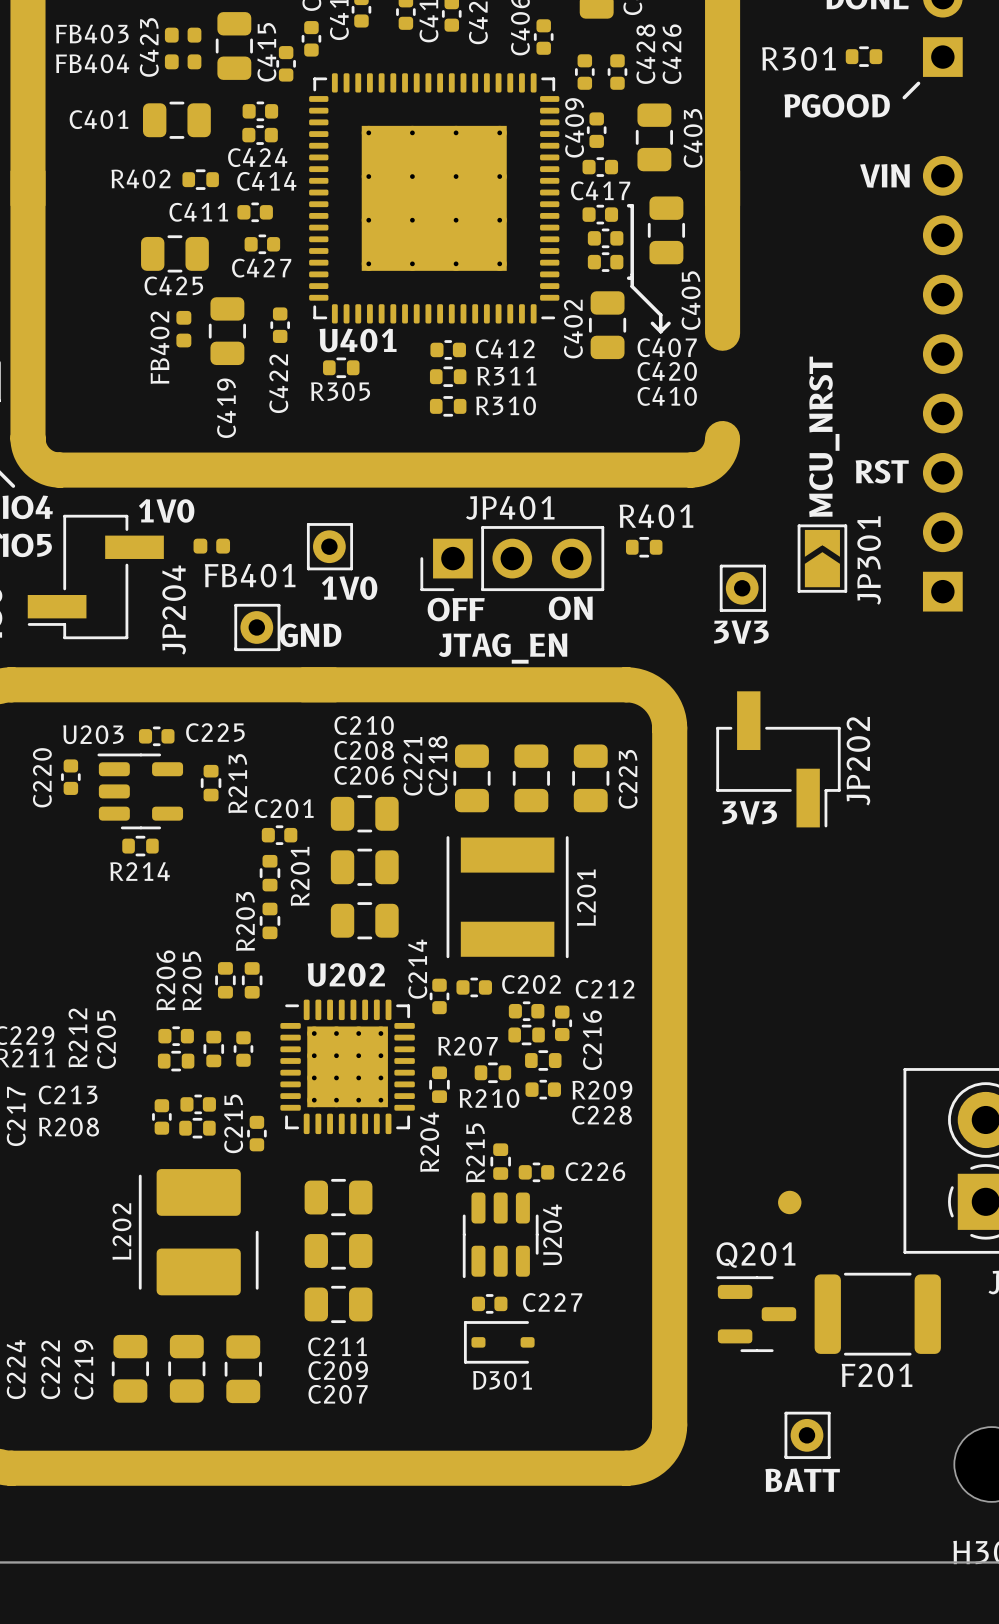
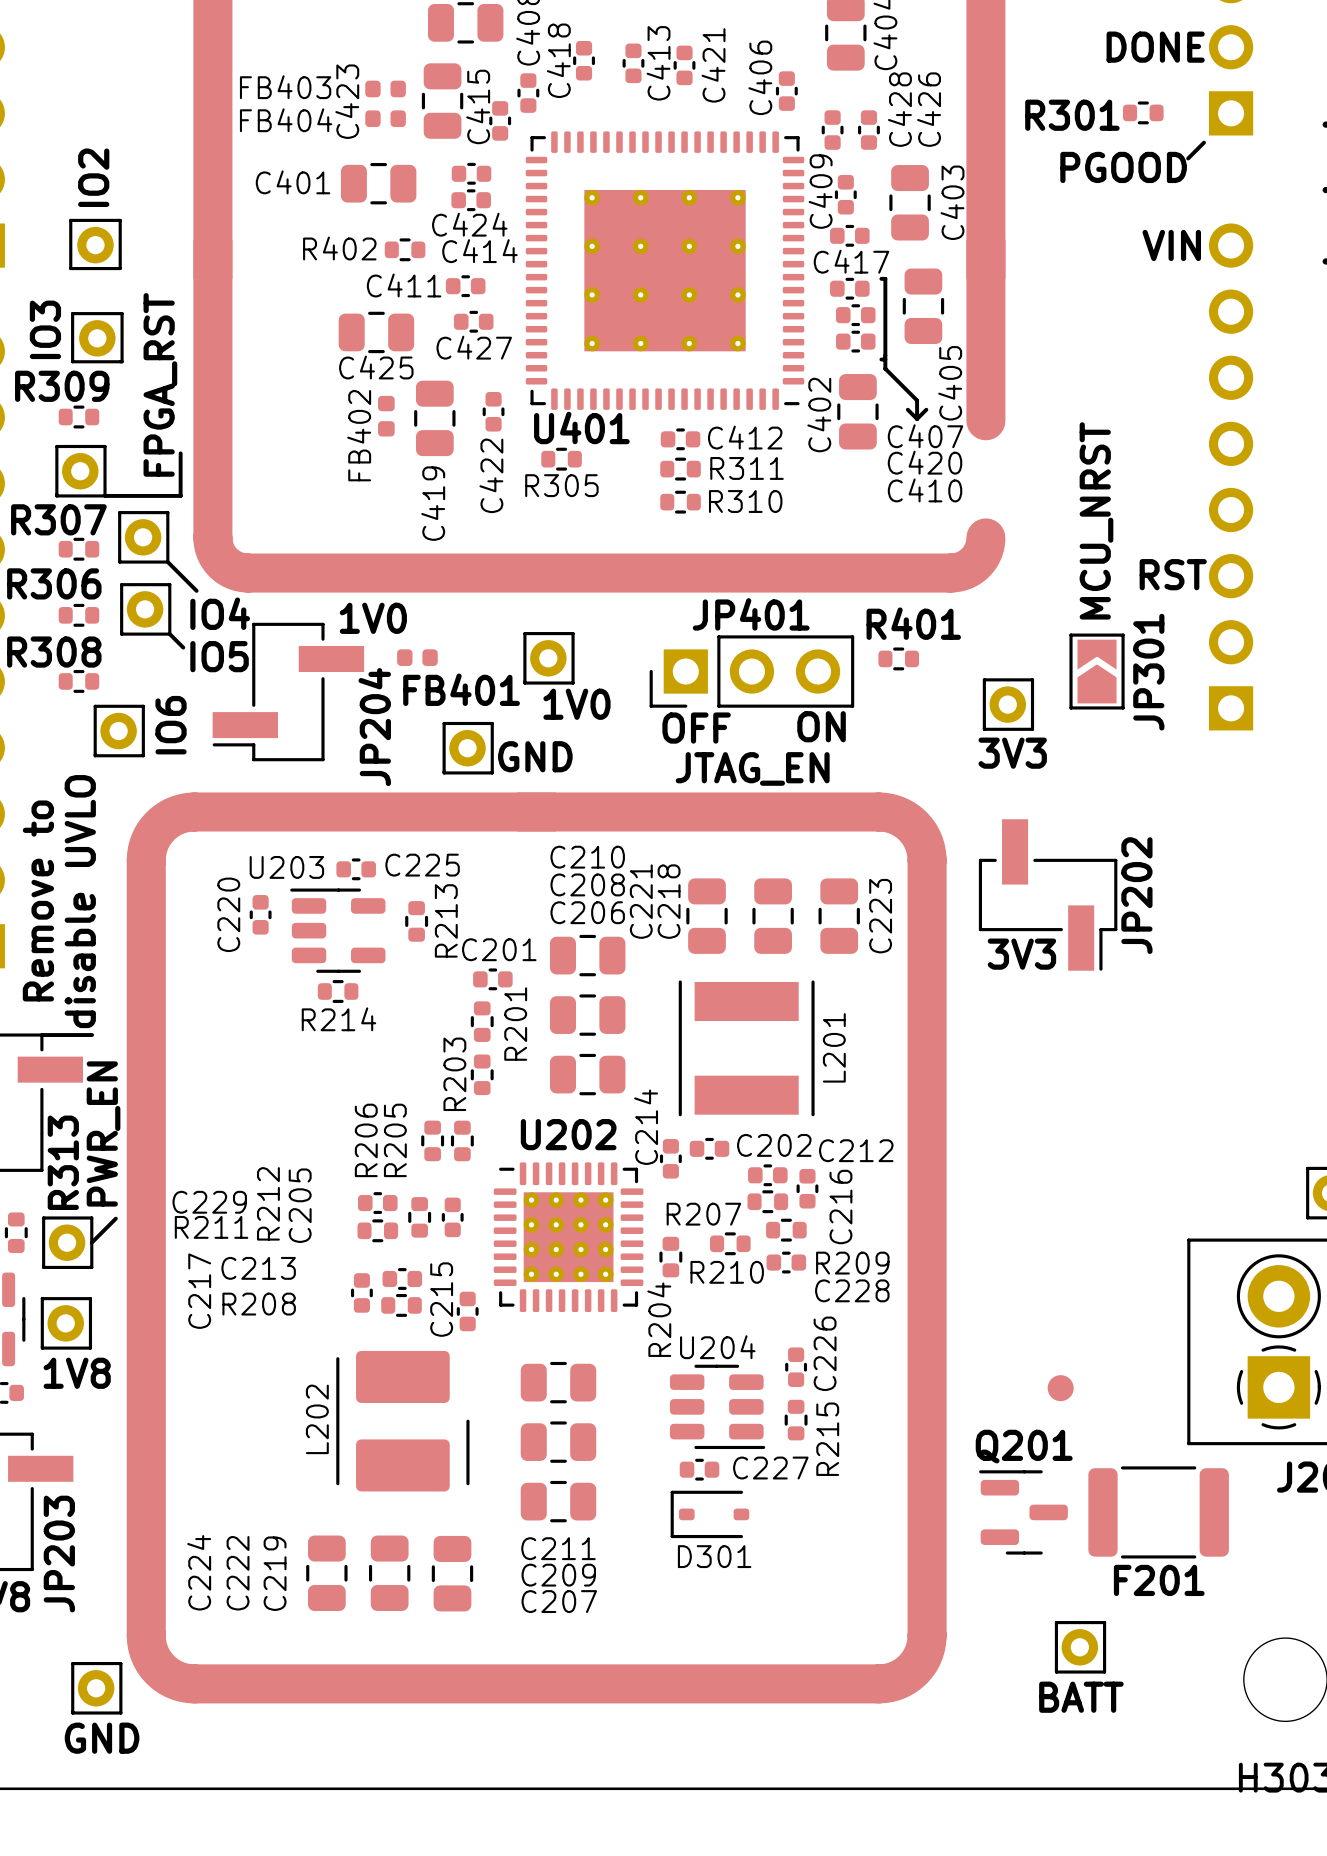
R215 name position: R215 (475, 1152) -> R215 (827, 1439)
R215 position: (500, 1161) -> (796, 1420)
C226 rotation: 0° (536, 1172) -> 90° clockwise (796, 1367)
U204 rotation: 0° (500, 1235) -> 90° counterclockwise (717, 1406)
C227 position: (489, 1303) -> (699, 1469)
D301 position: (499, 1342) -> (709, 1514)

